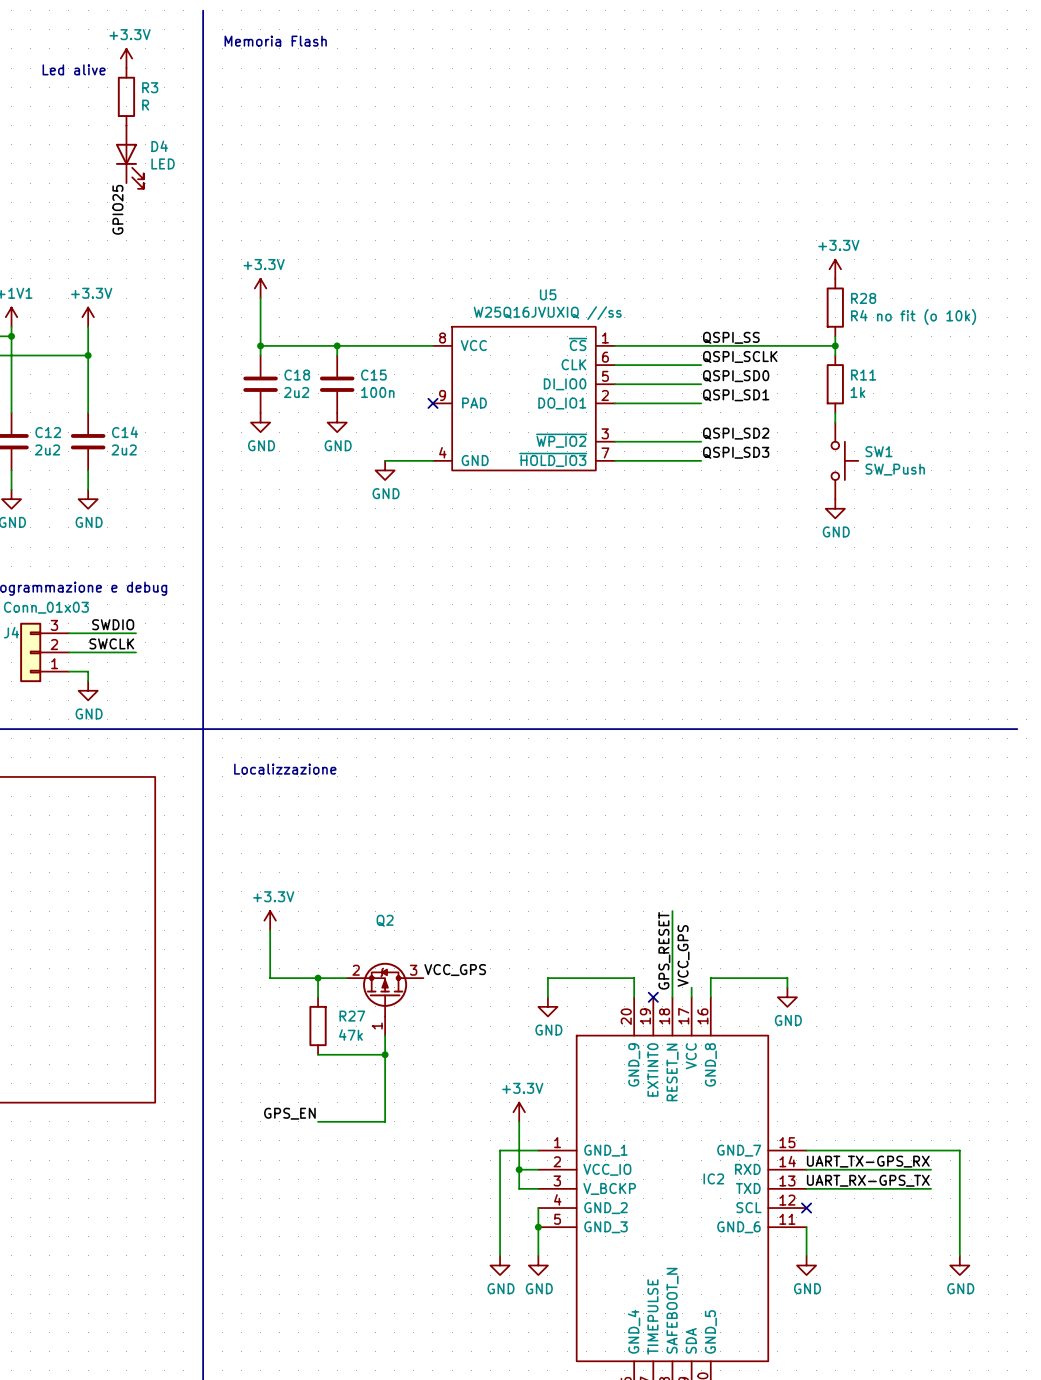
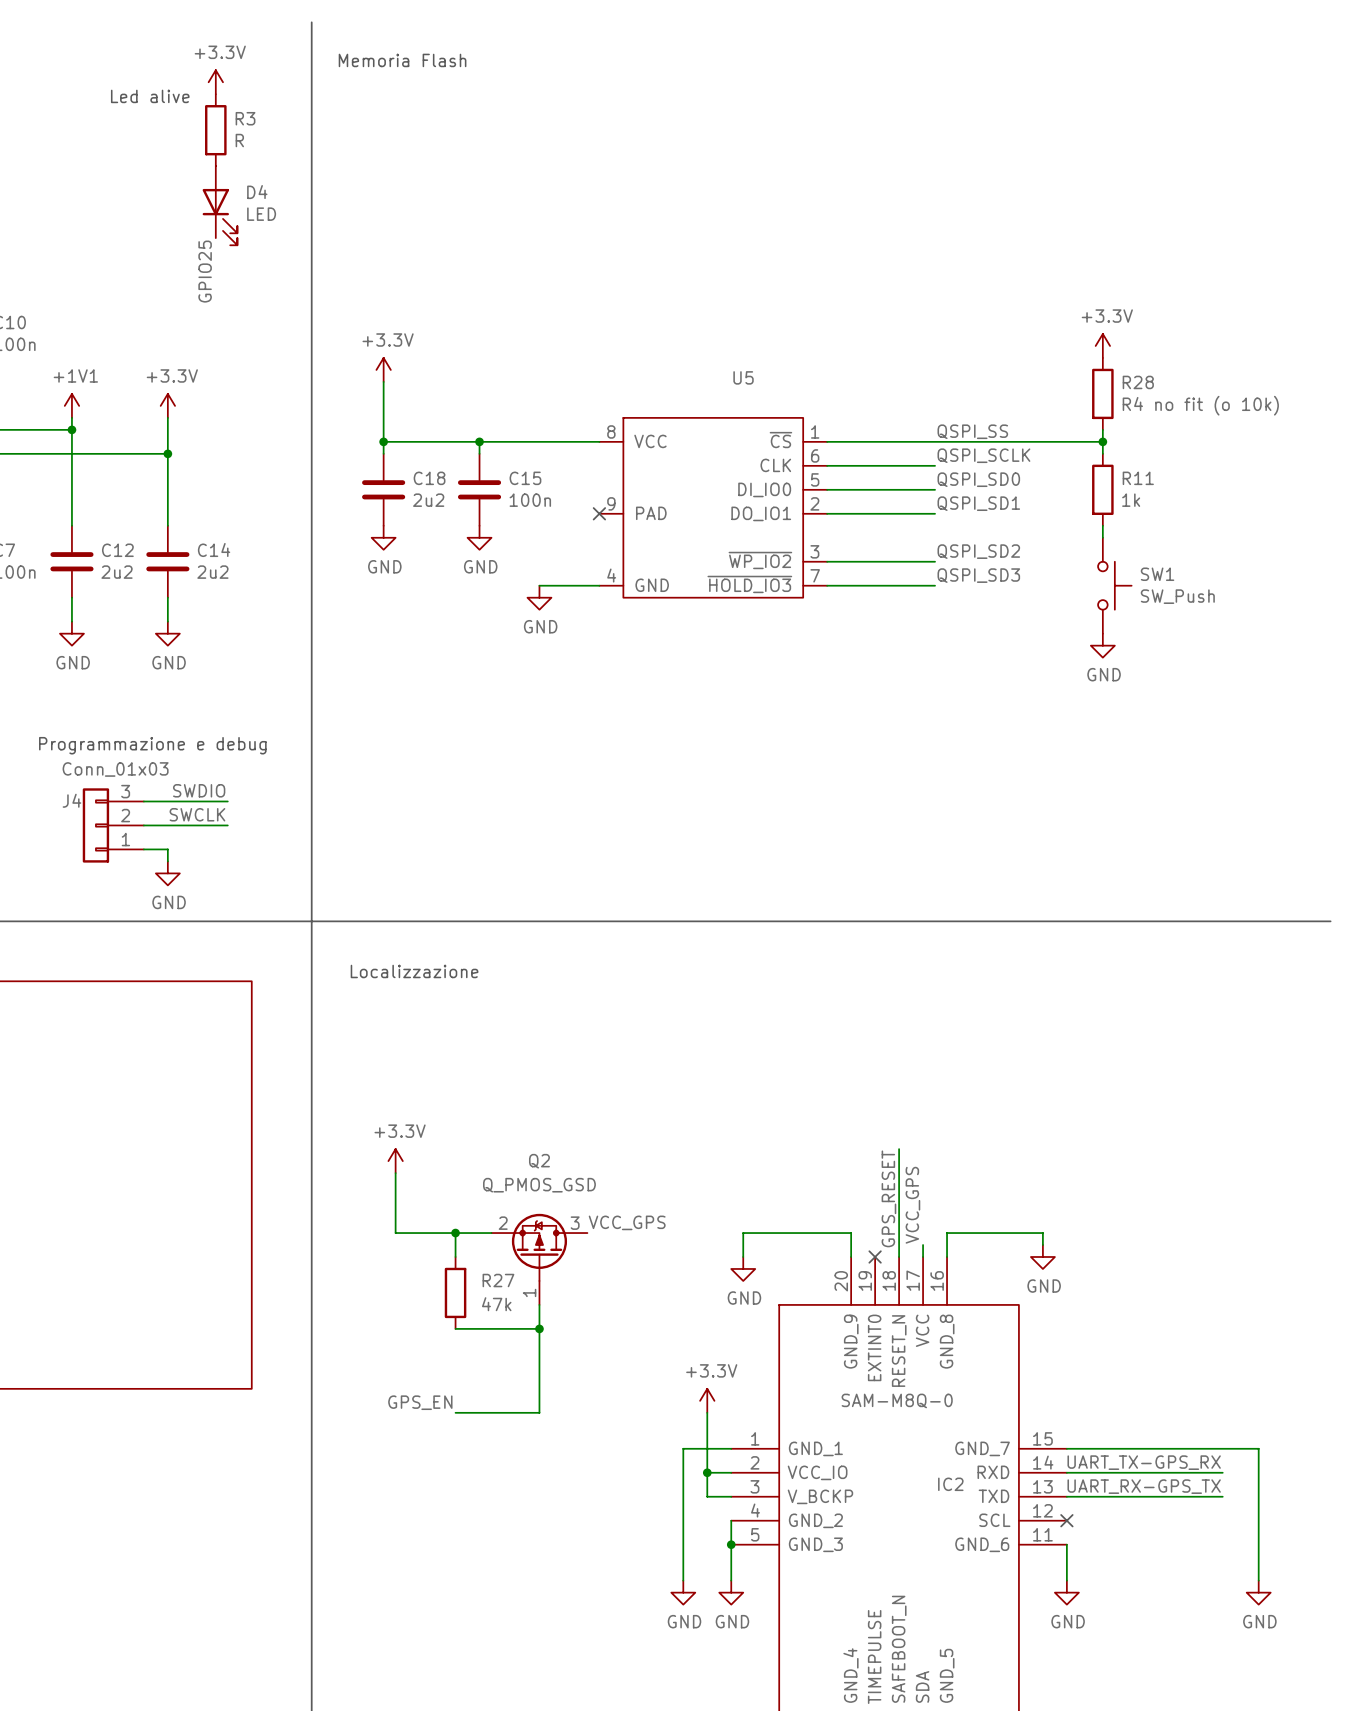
U5 value: W25Q16JVUXIQ //ss (547, 313) -> none
Q2 value: none -> Q_PMOS_GSD (539, 1185)
IC2 value: none -> SAM-M8Q-0 (897, 1400)

